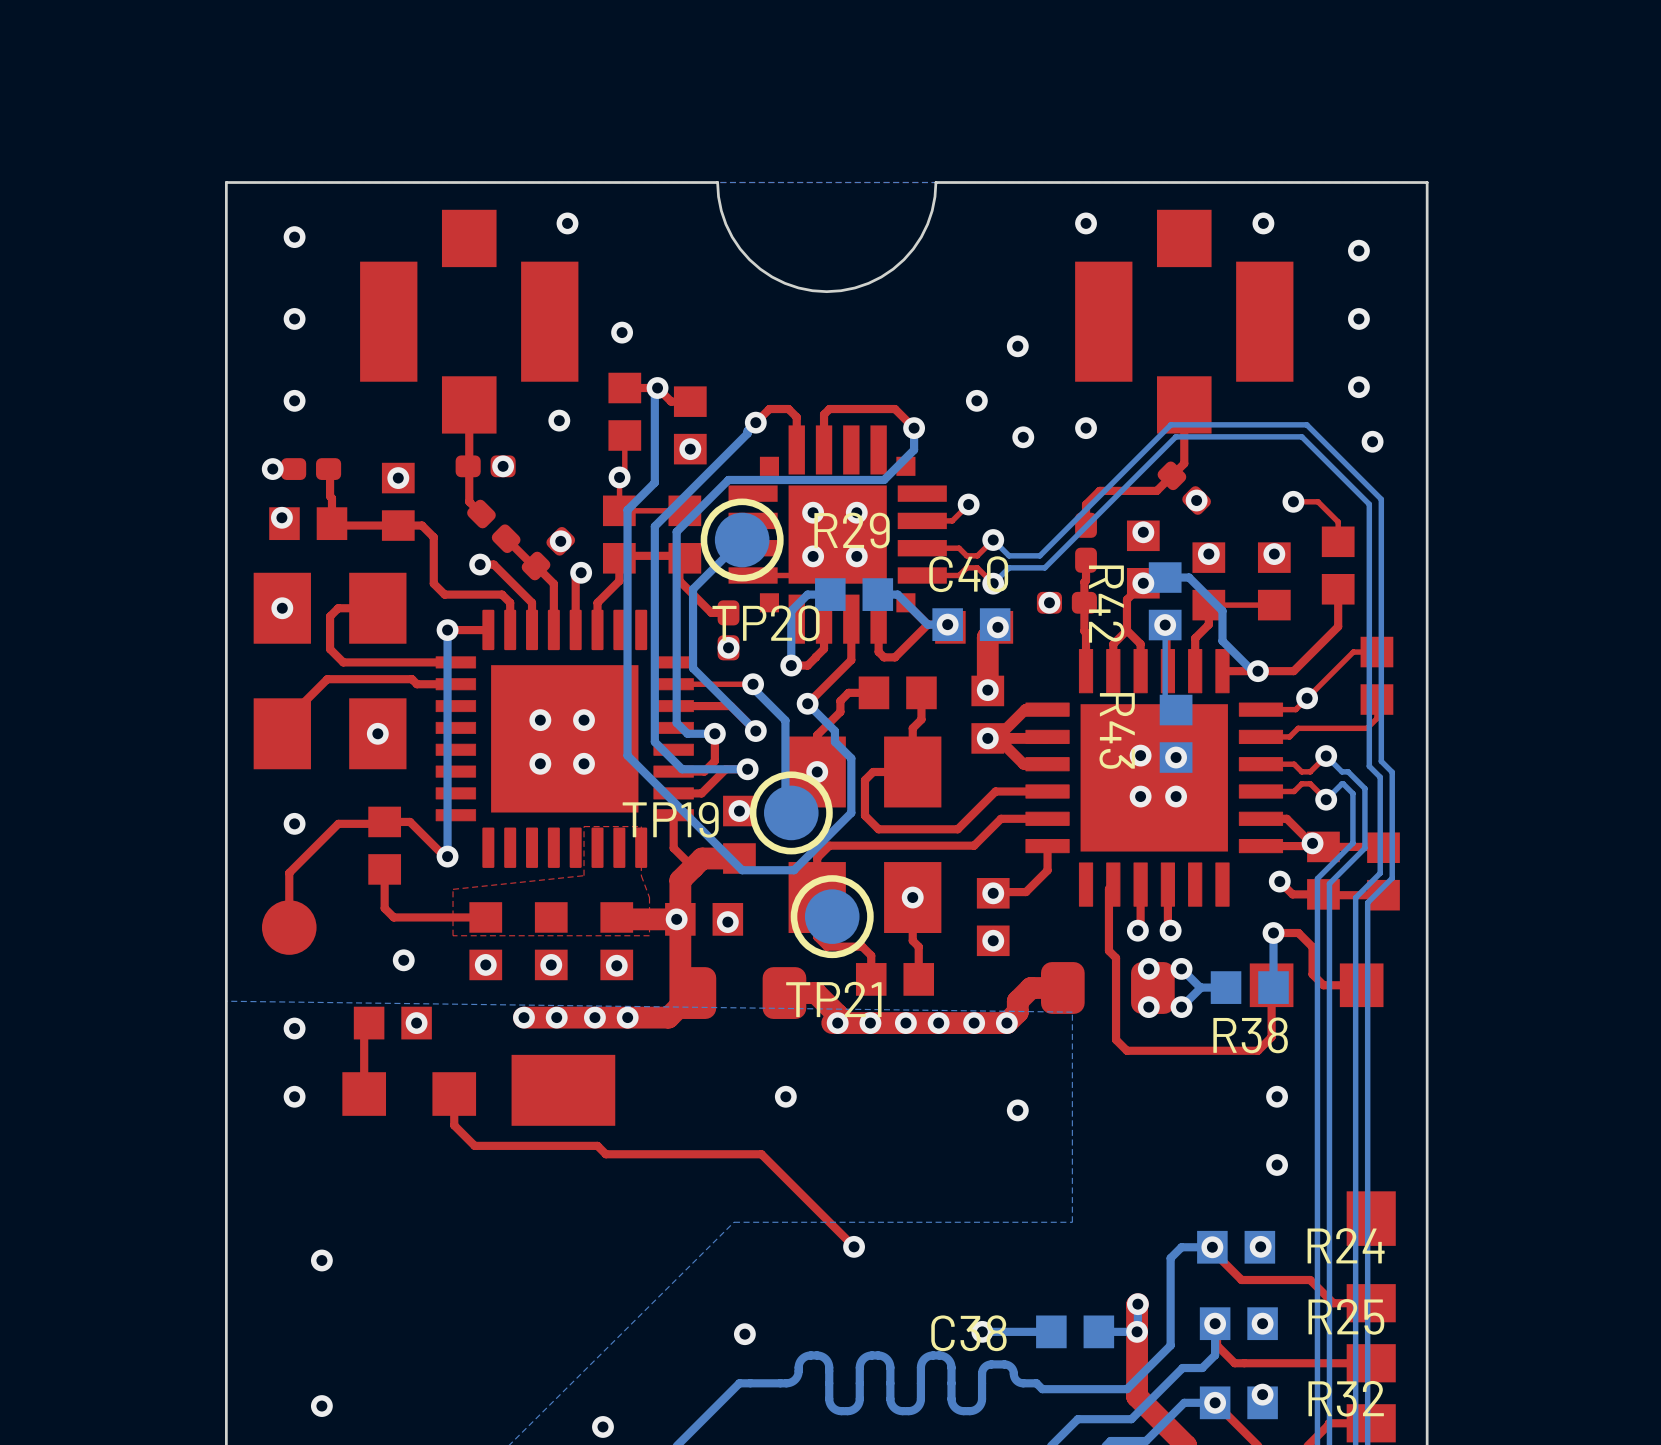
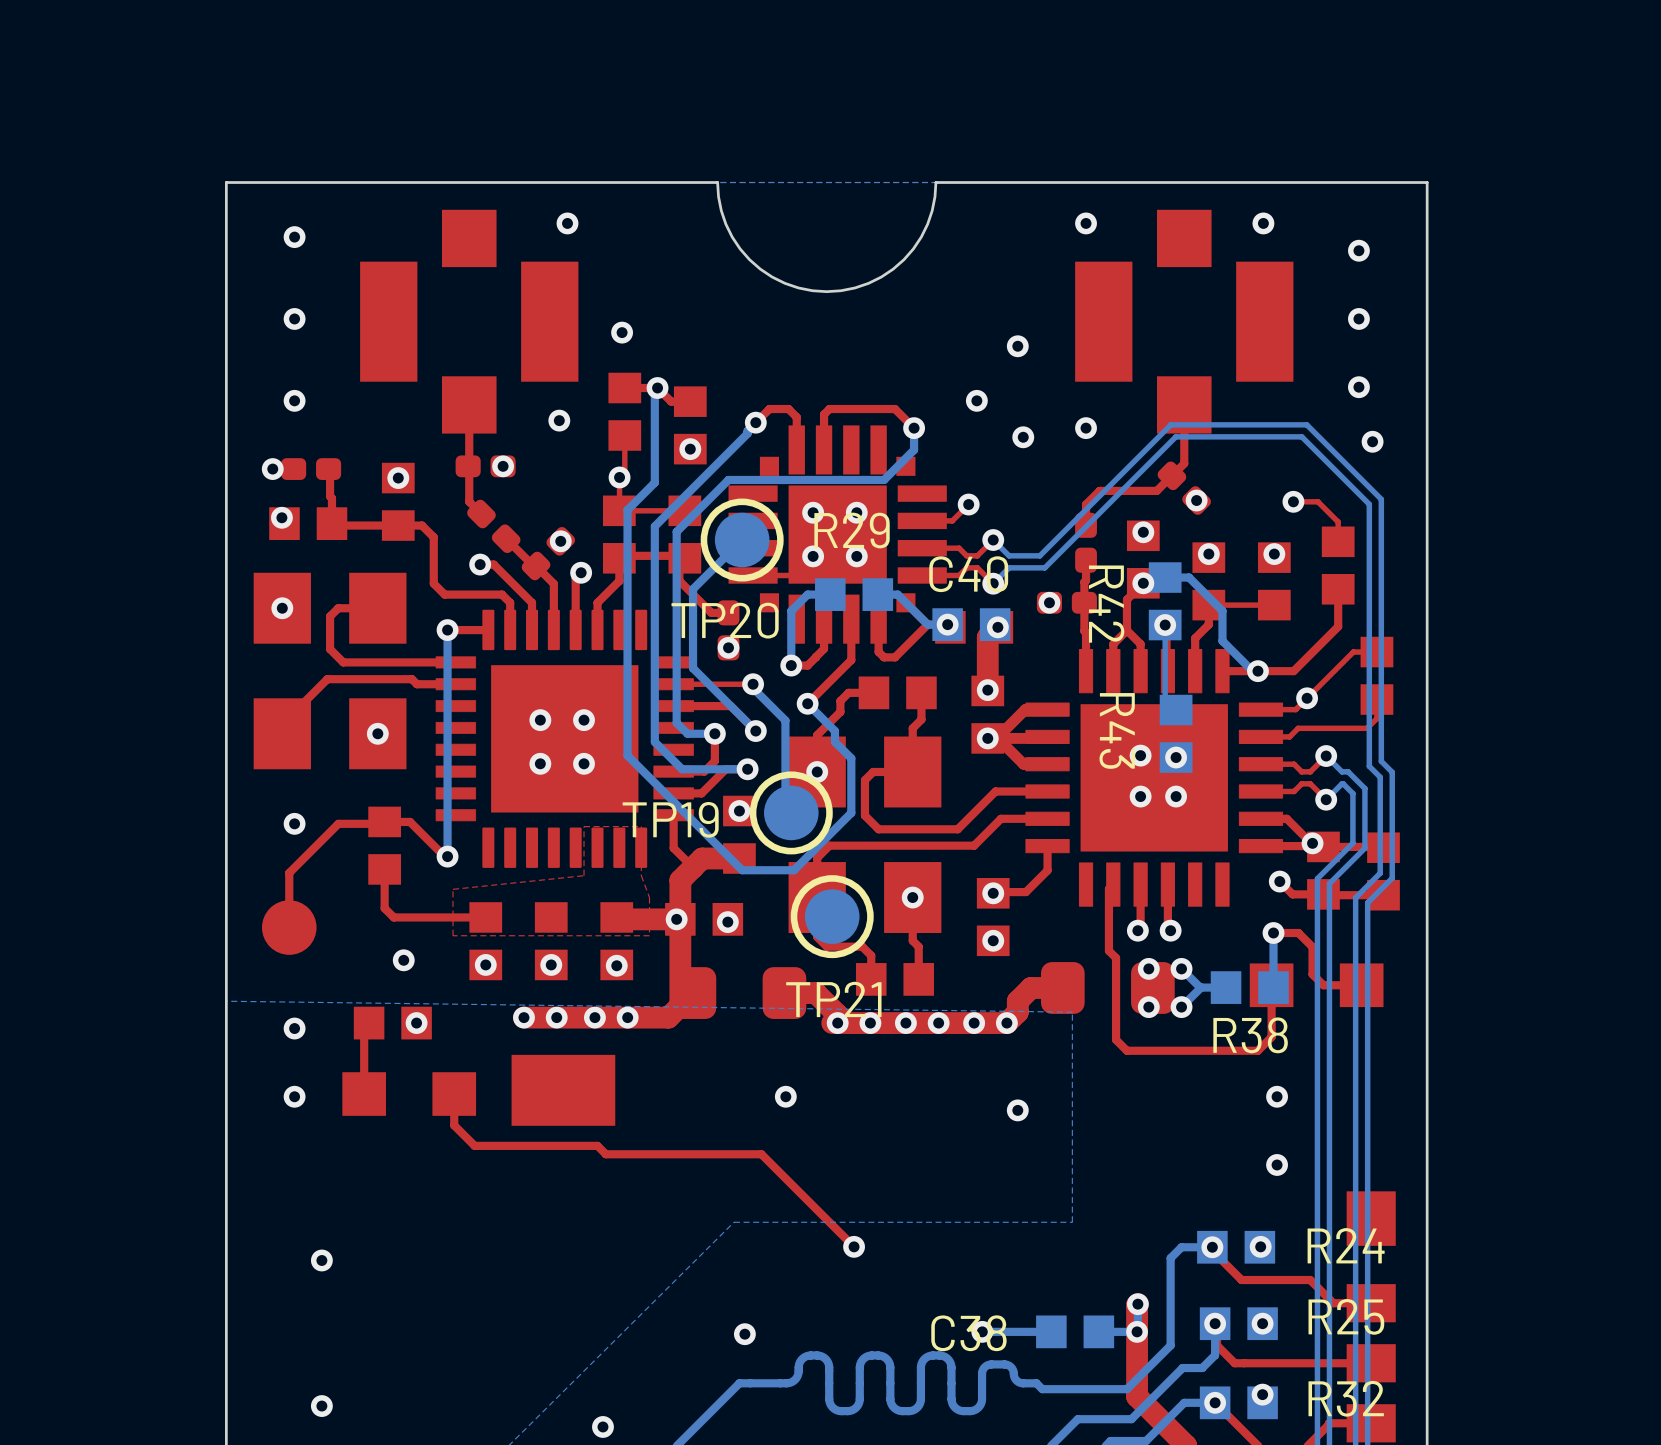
TP20 name position: TP20 (766, 623) -> TP20 (725, 620)

